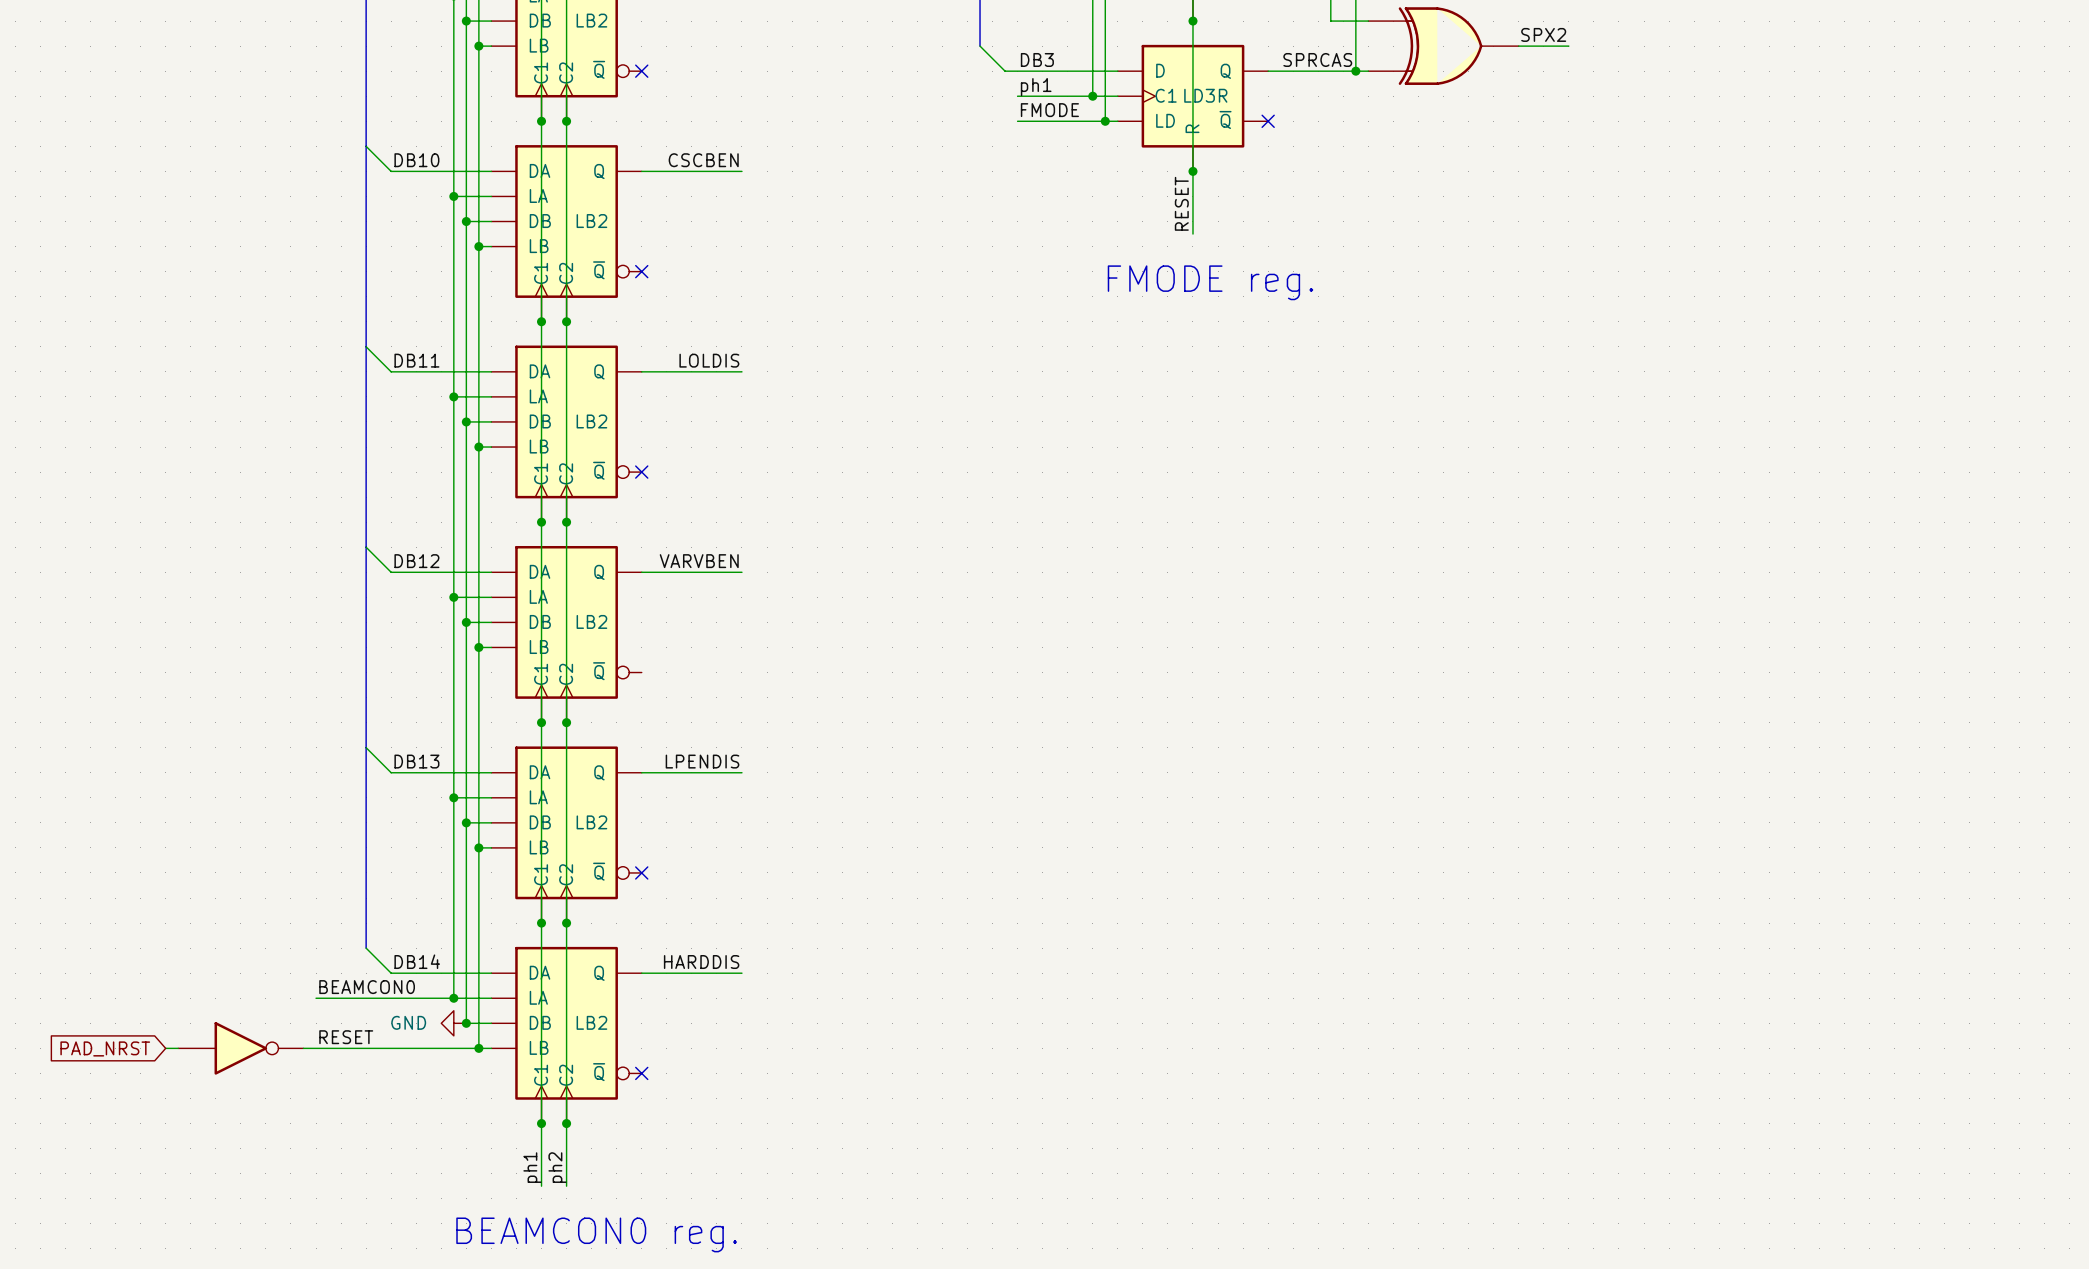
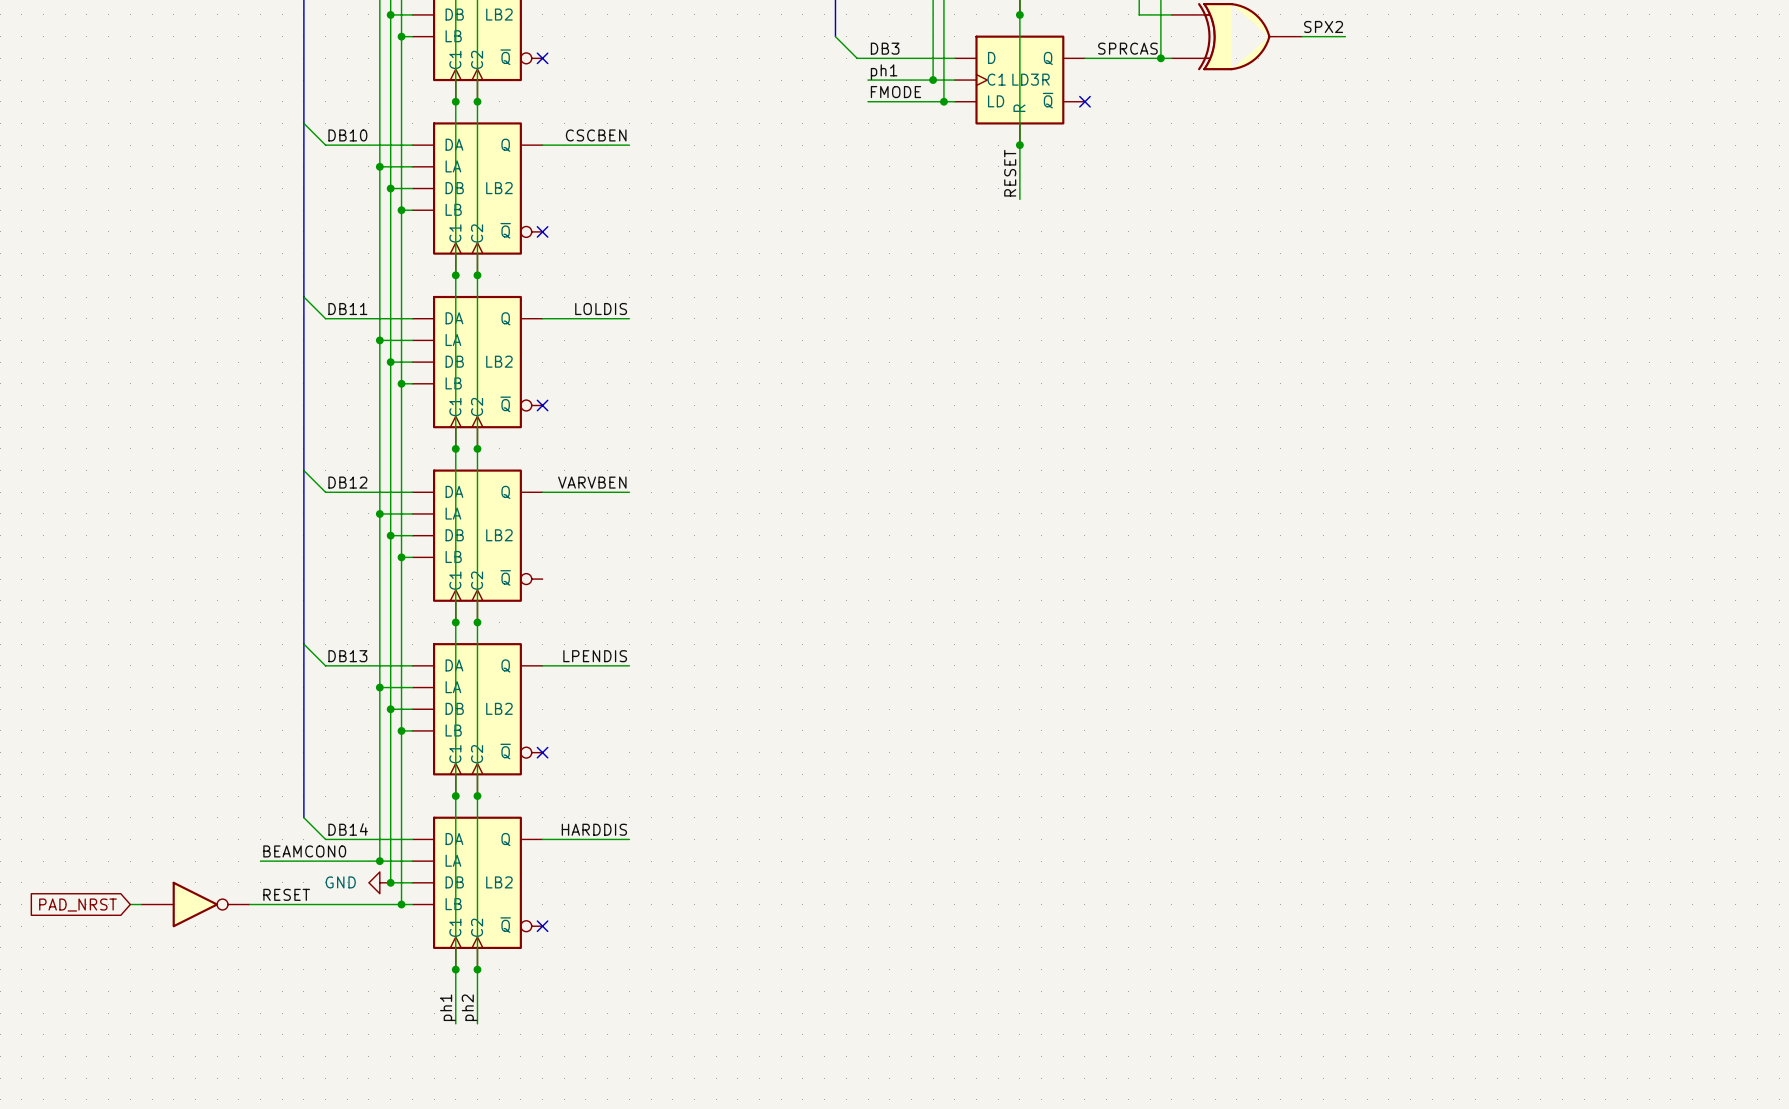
text: FMODE reg. (1210, 282) -> none
text: BEAMCON0 reg. (596, 1234) -> none

